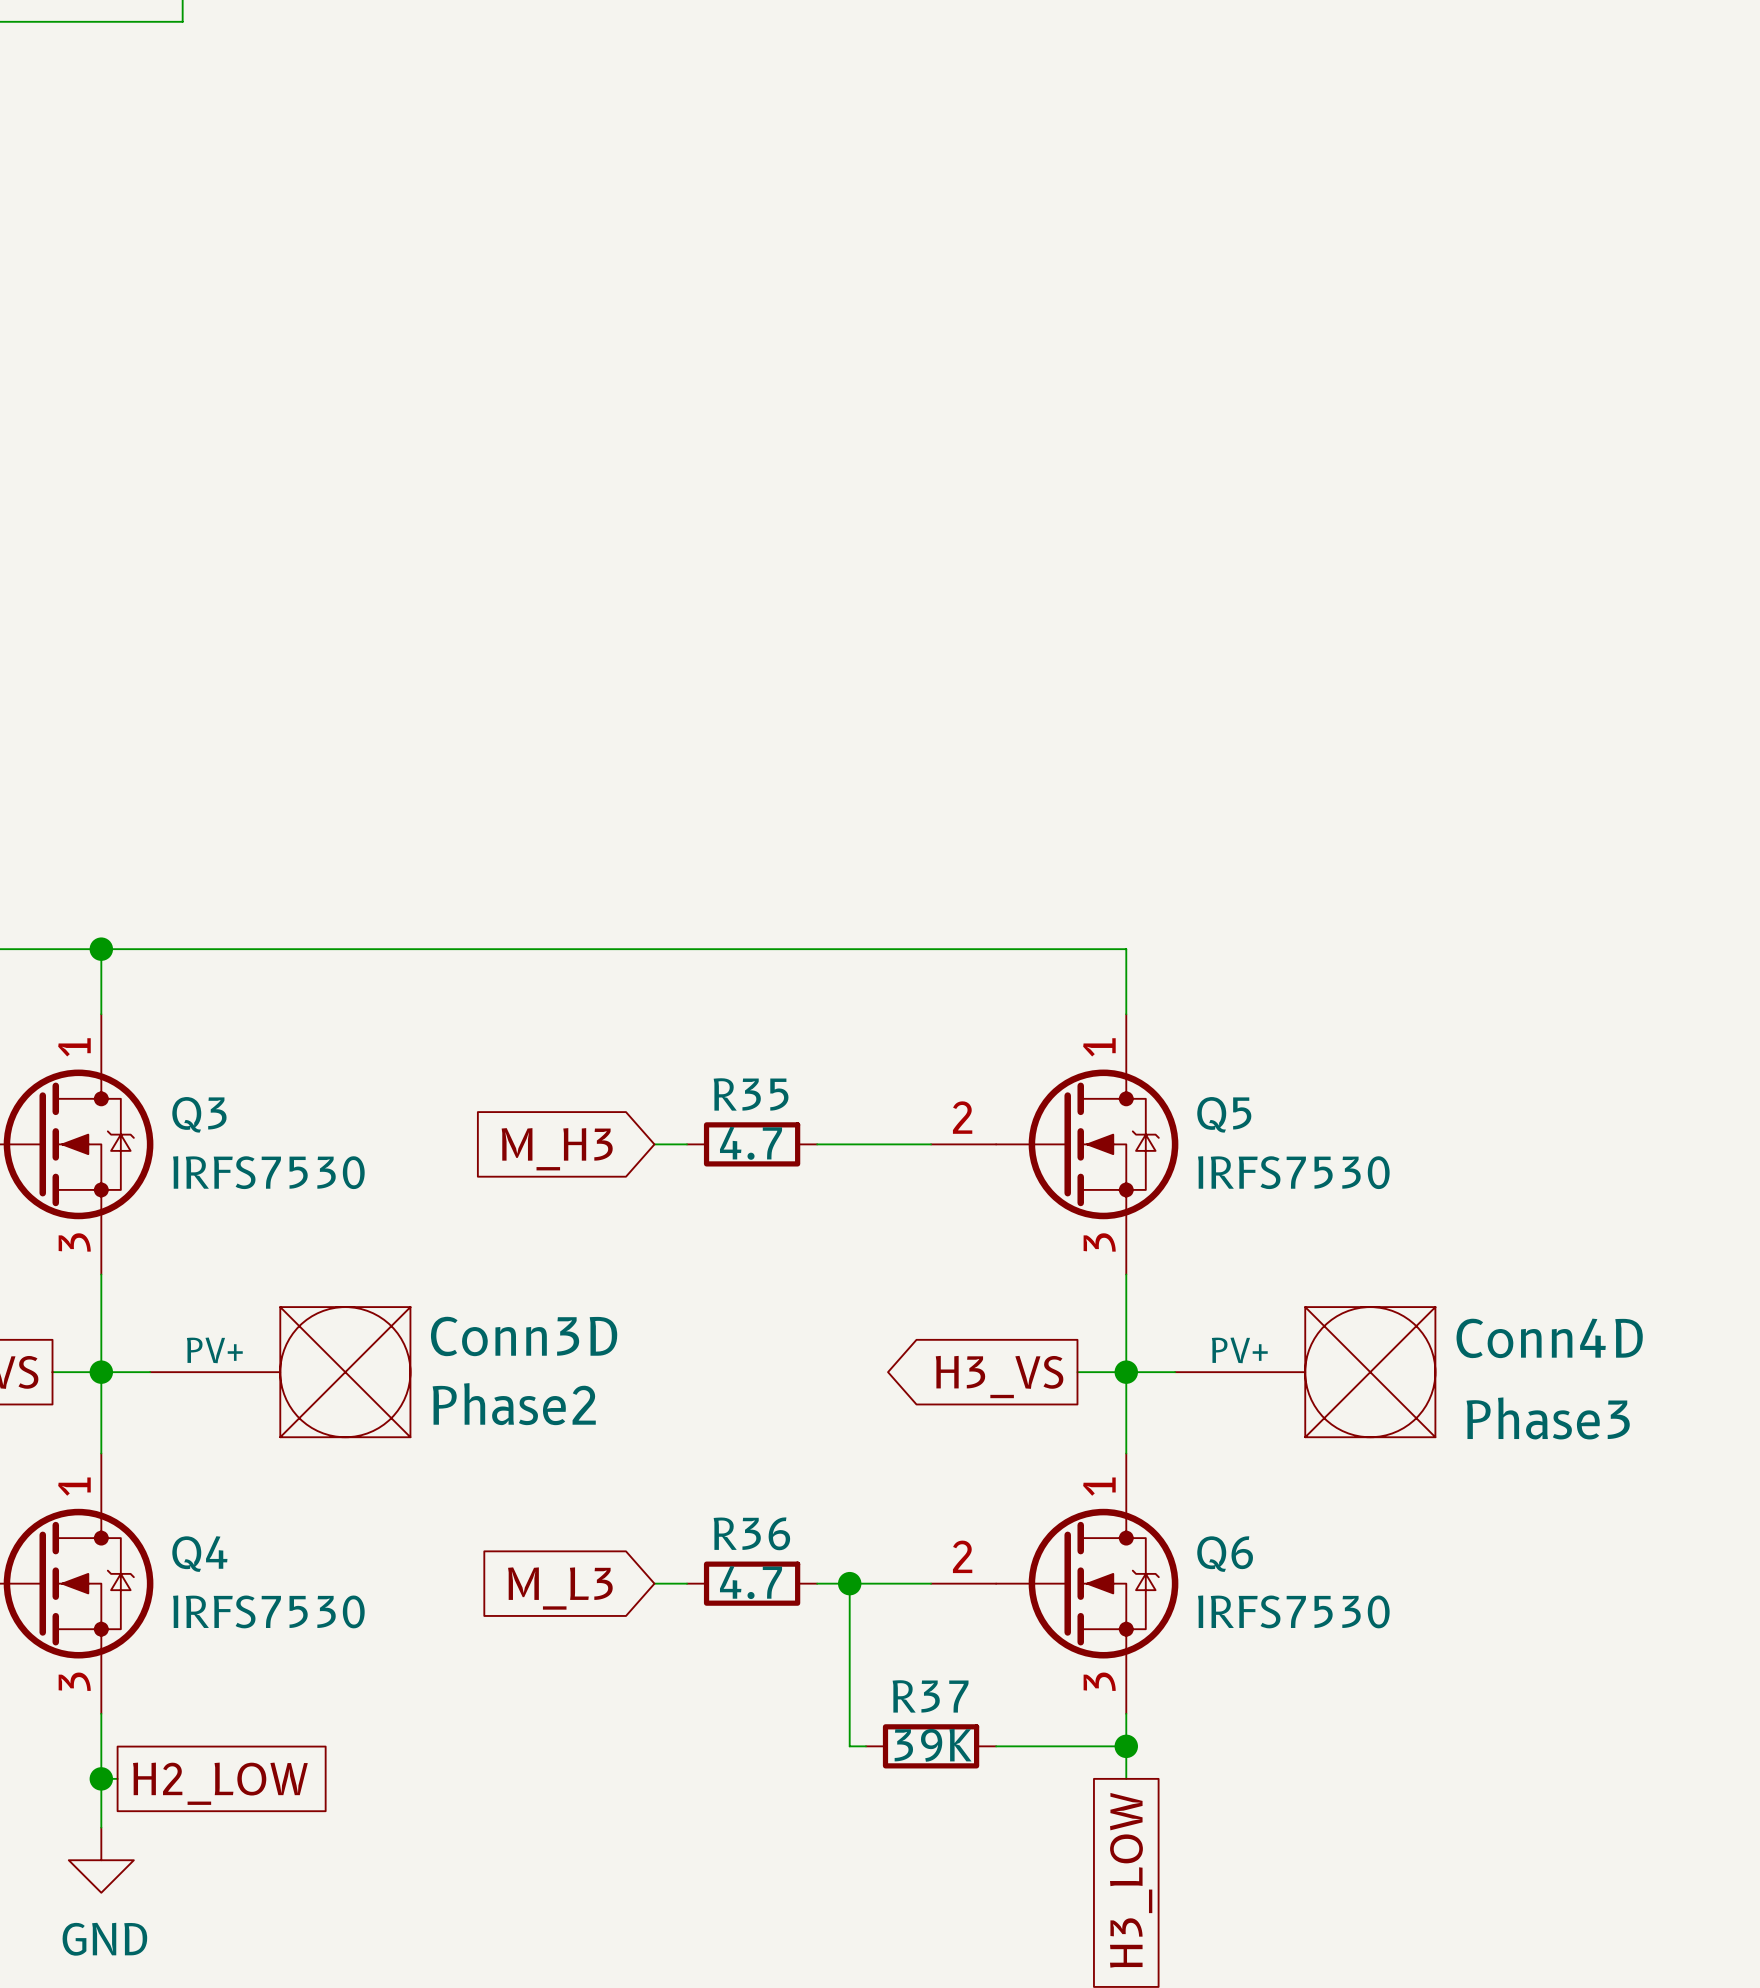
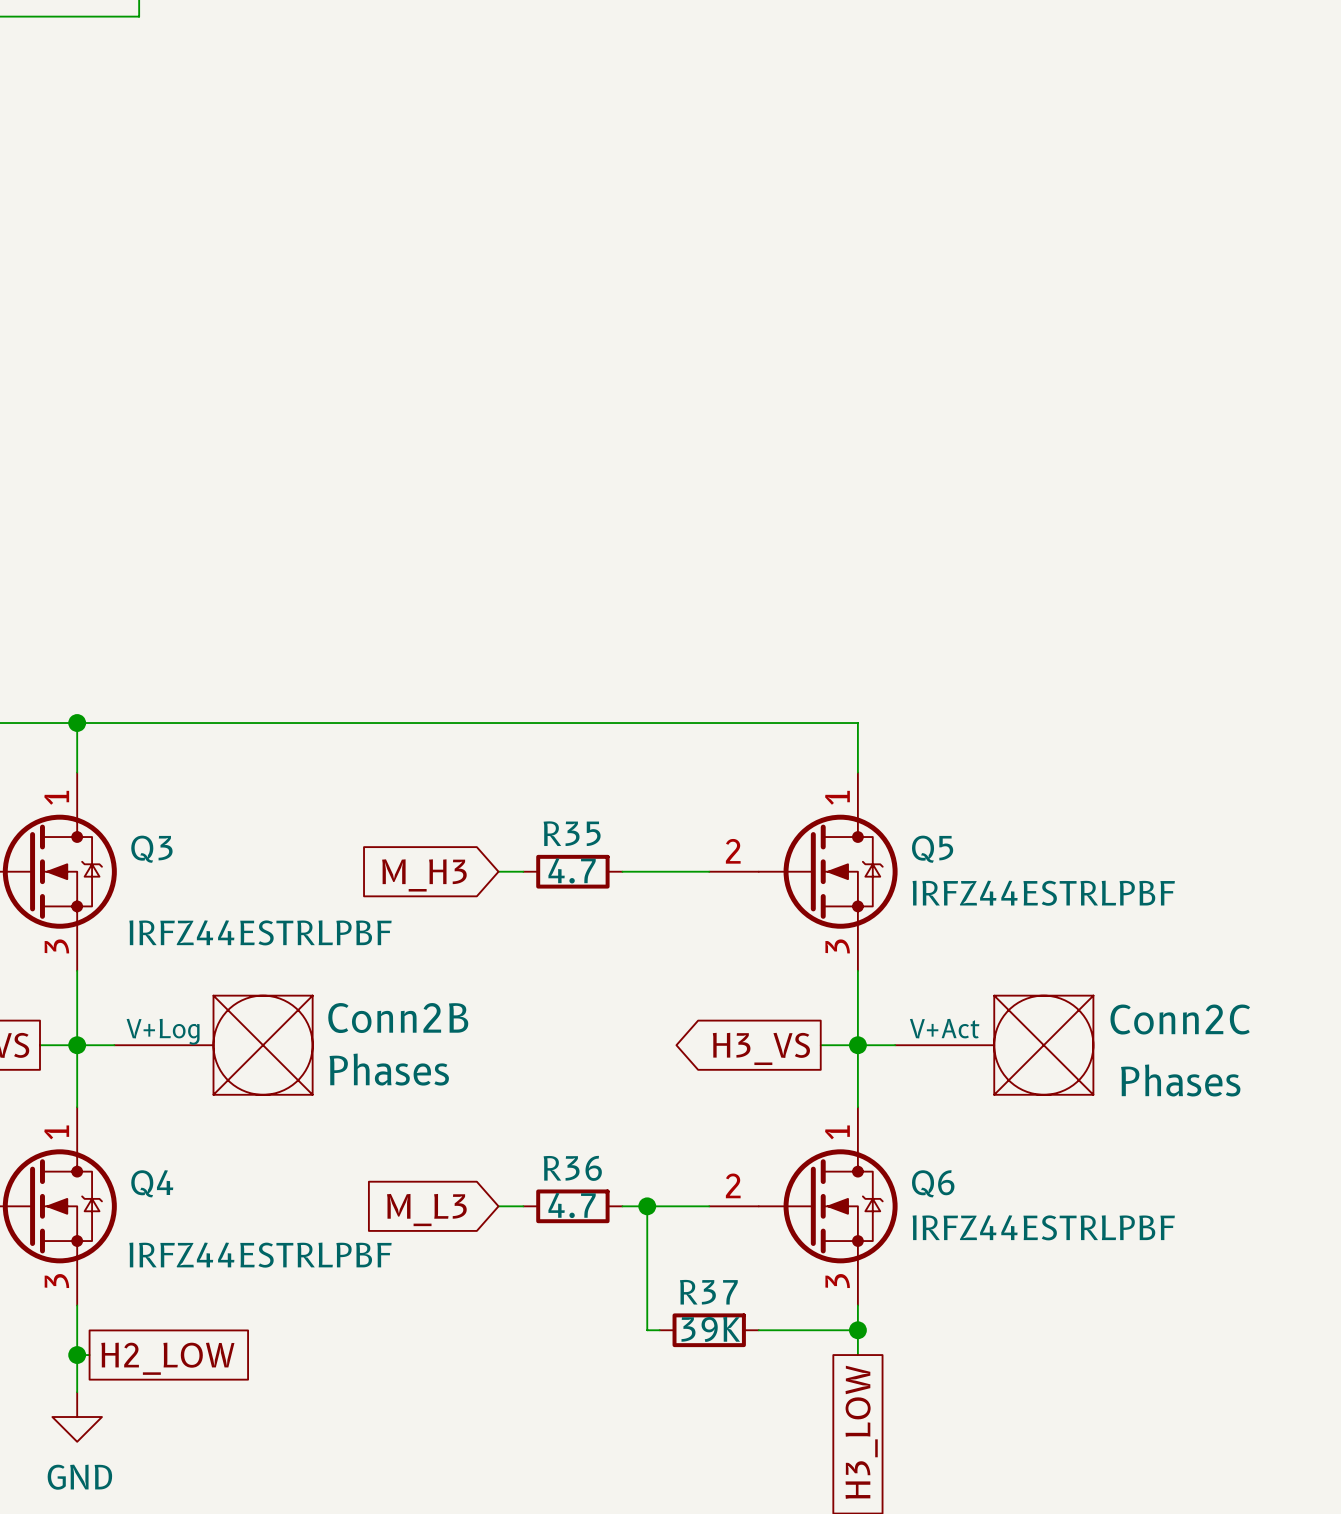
Q3 value: IRFS7530 (268, 1172) -> IRFZ44ESTRLPBF (260, 932)
Q5 value: IRFS7530 (1293, 1172) -> IRFZ44ESTRLPBF (1043, 893)
Conn3D name: Conn3D (524, 1336) -> Conn2B (398, 1018)
Conn4D name: Conn4D (1549, 1338) -> Conn2C (1180, 1019)
Conn3D pin name: PV+ (214, 1350) -> V+Log (163, 1031)
Conn4D pin name: PV+ (1239, 1350) -> V+Act (944, 1028)
Conn3D value: Phase2 (514, 1404) -> Phases (389, 1069)
Conn4D value: Phase3 (1548, 1418) -> Phases (1180, 1080)
Q4 value: IRFS7530 (268, 1611) -> IRFZ44ESTRLPBF (260, 1255)
Q6 value: IRFS7530 (1293, 1611) -> IRFZ44ESTRLPBF (1043, 1227)

